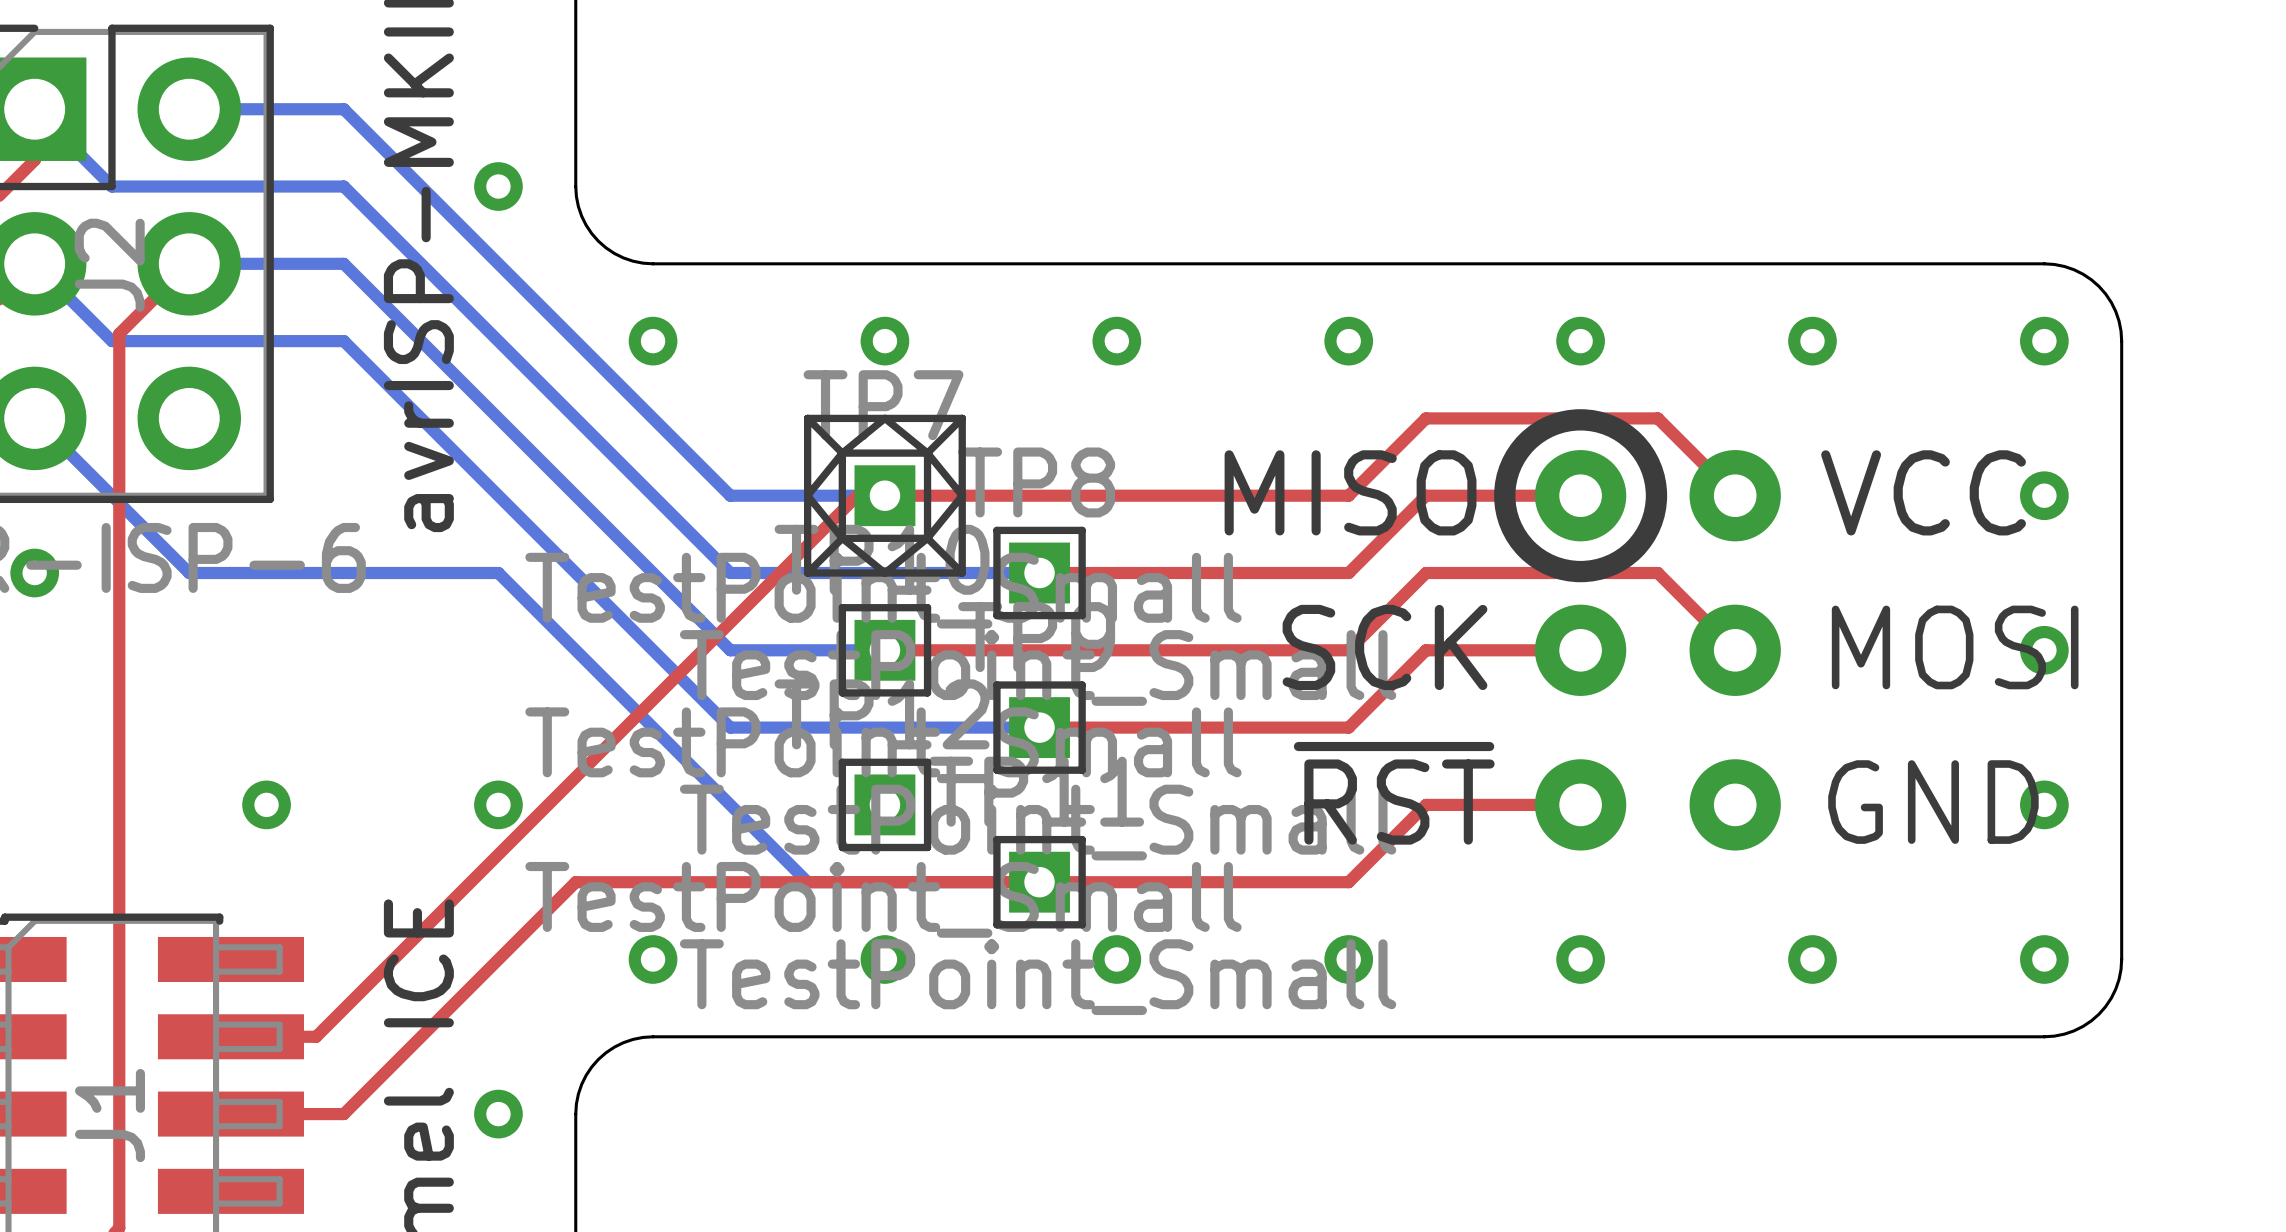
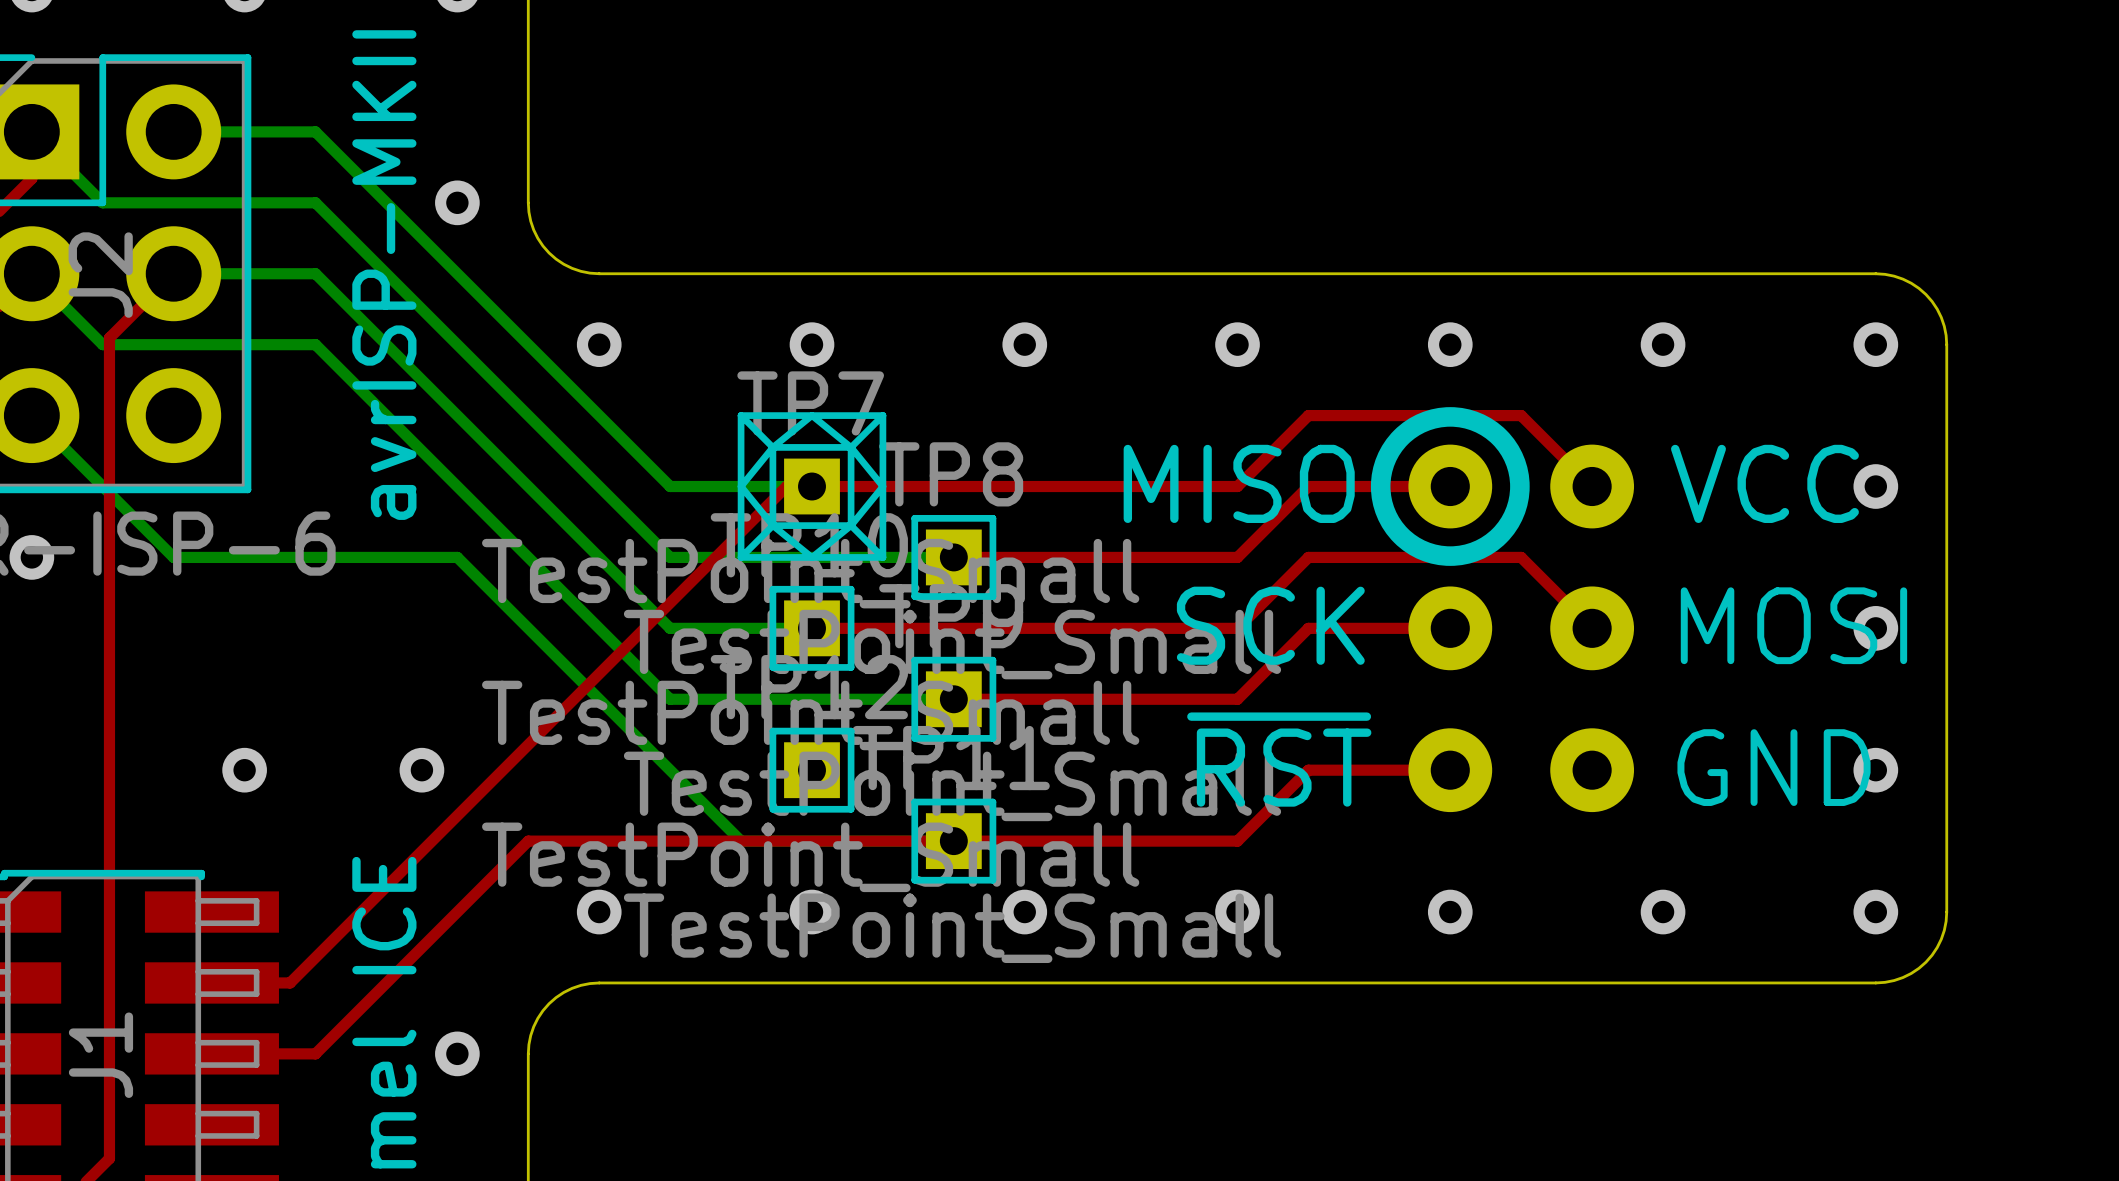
via position: (498, 804) -> (421, 770)

